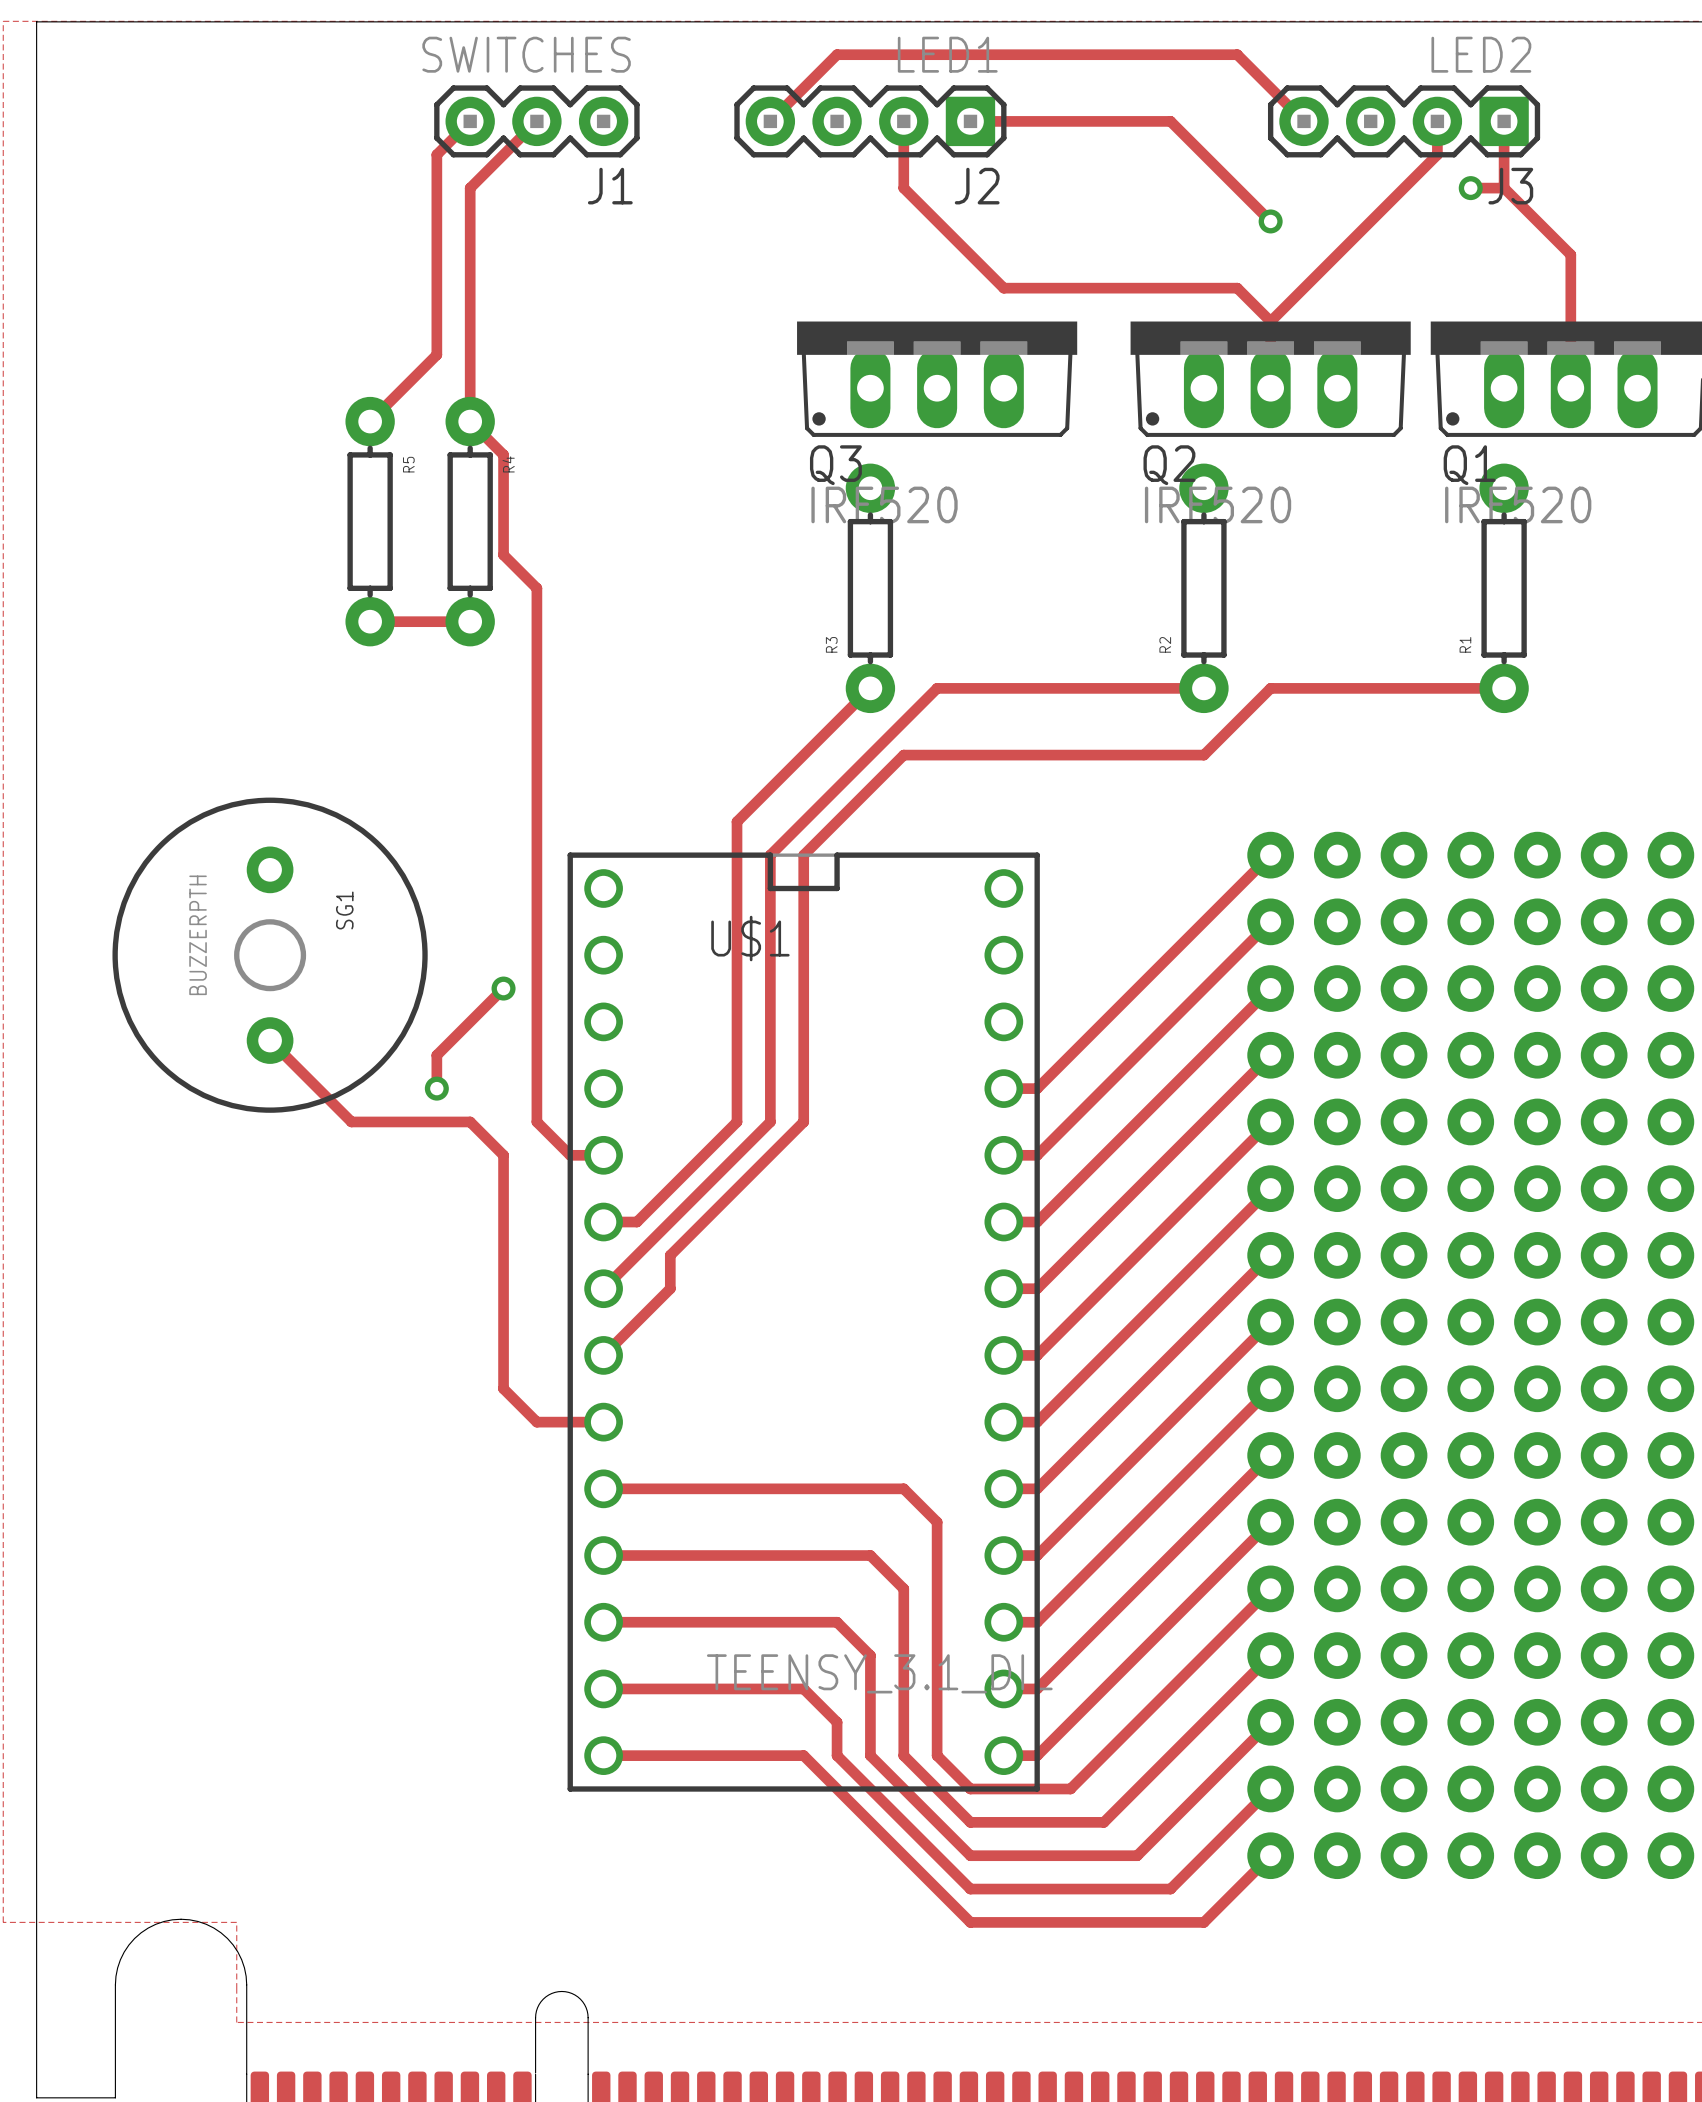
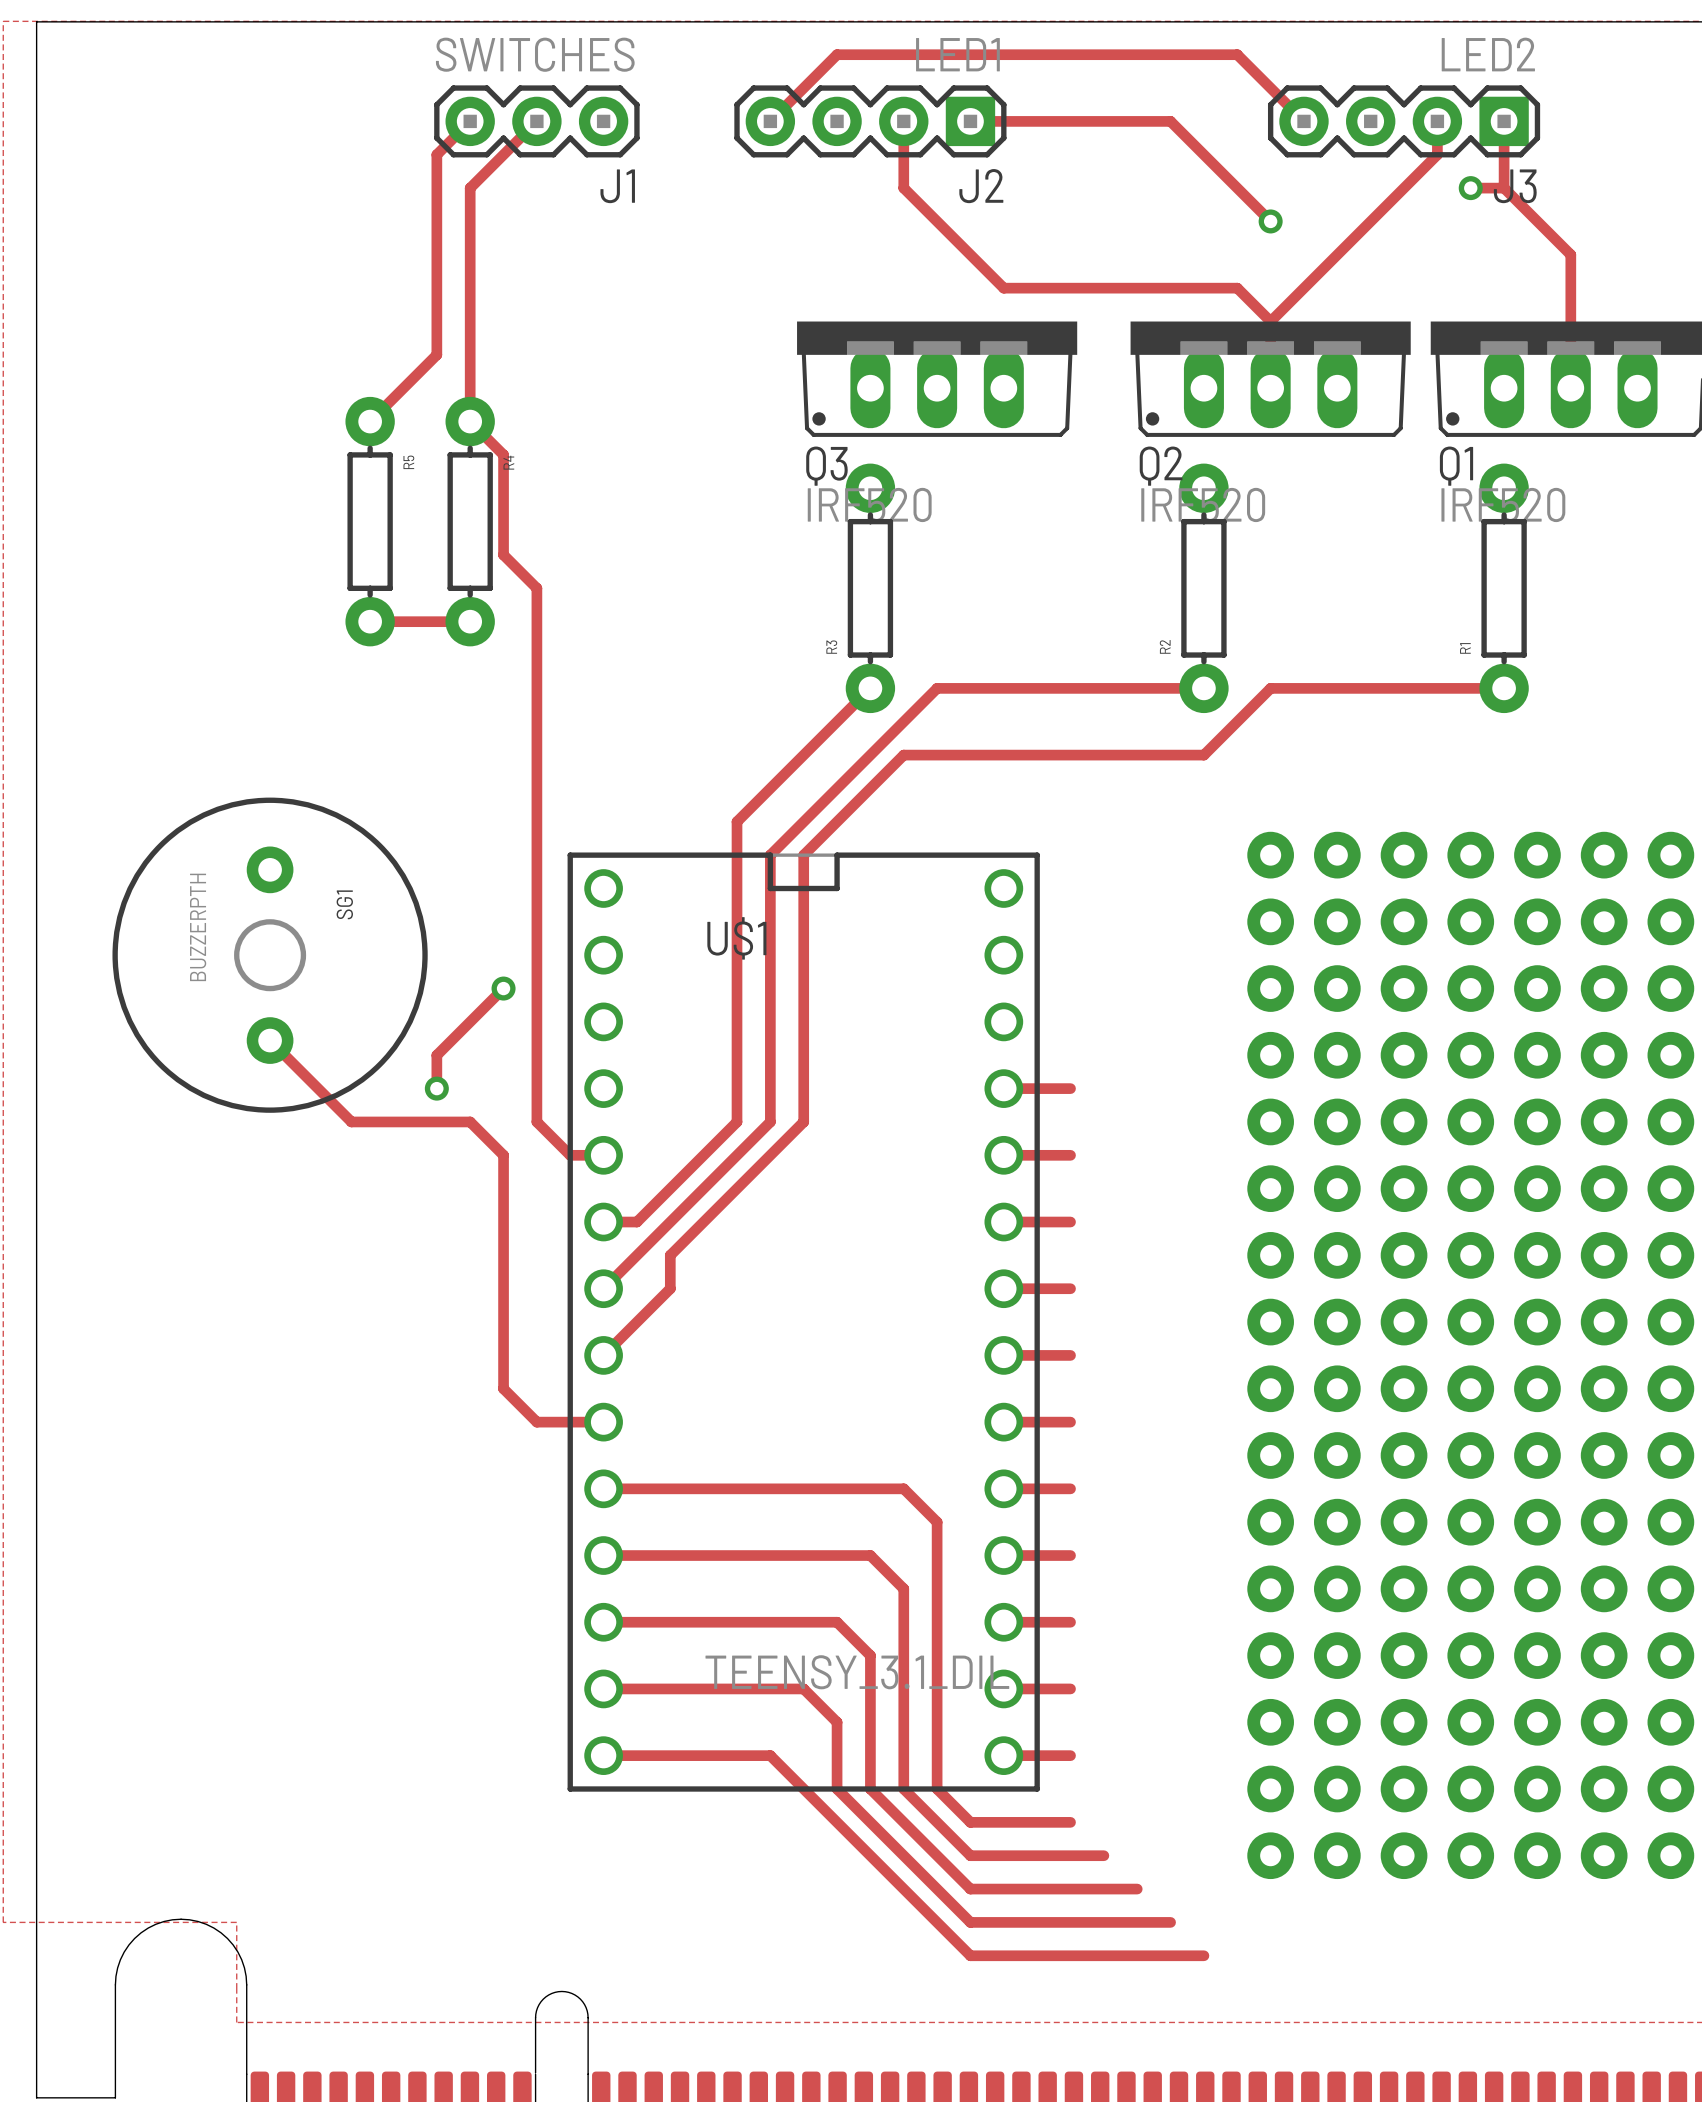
track: (1270, 855) (1037, 1088) -> (1070, 1088) (1037, 1088)
track: (1270, 921) (1037, 1155) -> (1070, 1155) (1037, 1155)
track: (1270, 988) (1037, 1222) -> (1070, 1222) (1037, 1222)
track: (1270, 1055) (1037, 1288) -> (1070, 1288) (1037, 1288)
track: (1270, 1121) (1037, 1355) -> (1070, 1355) (1037, 1355)
track: (1270, 1188) (1037, 1422) -> (1070, 1422) (1037, 1422)
track: (1270, 1255) (1037, 1488) -> (1070, 1488) (1037, 1488)
track: (1270, 1322) (1037, 1555) -> (1070, 1555) (1037, 1555)
track: (1270, 1388) (1037, 1622) -> (1070, 1622) (1037, 1622)
track: (1270, 1455) (1037, 1688) -> (1070, 1688) (1037, 1688)
track: (1270, 1522) (1037, 1755) -> (1070, 1755) (1037, 1755)
track: (1270, 1588) (1070, 1789) (970, 1789) (937, 1755) -> (937, 1789) (937, 1755)
track: (1270, 1655) (1103, 1822) (1070, 1822) -> none
track: (1270, 1722) (1137, 1855) (1103, 1855) -> none
track: (770, 1755) (803, 1755) (837, 1789) -> (770, 1755) (970, 1955) (1203, 1955)
track: (837, 1755) (870, 1789) -> (837, 1755) (837, 1789)
track: (870, 1755) (903, 1789) -> (870, 1755) (870, 1789)
track: (903, 1755) (937, 1789) -> (903, 1755) (903, 1789)
track: (1270, 1789) (1170, 1889) (1137, 1889) -> none
track: (1270, 1855) (1203, 1922) (1170, 1922) -> none

